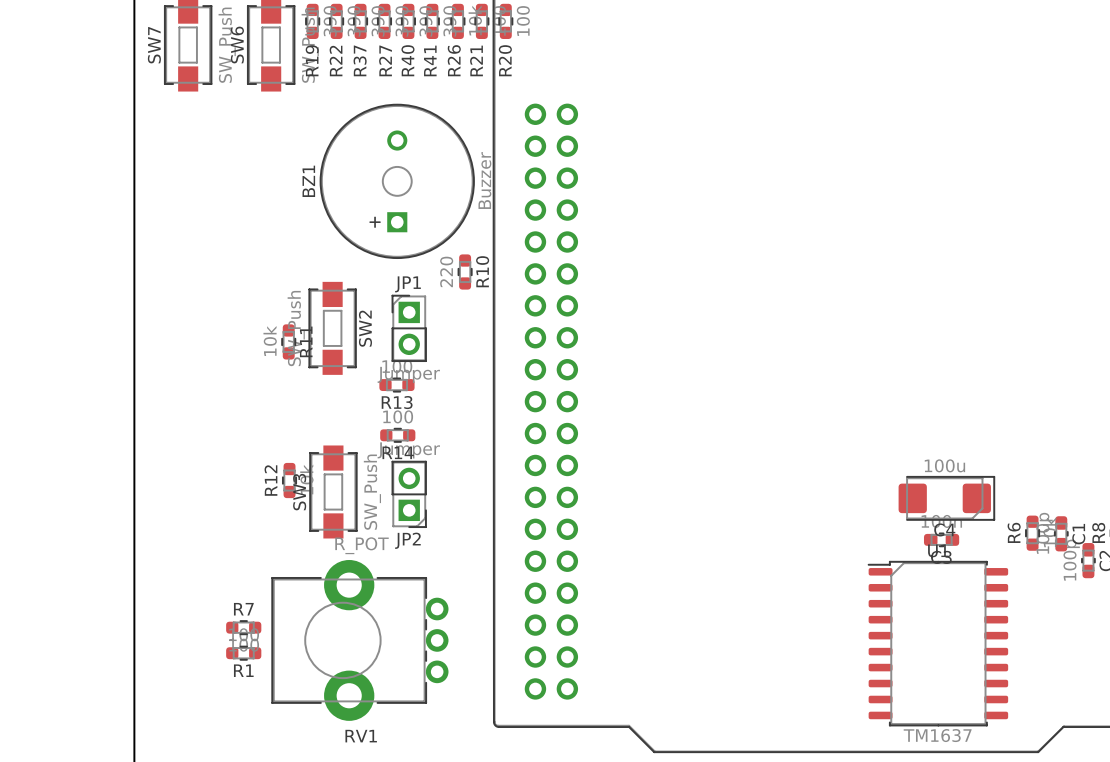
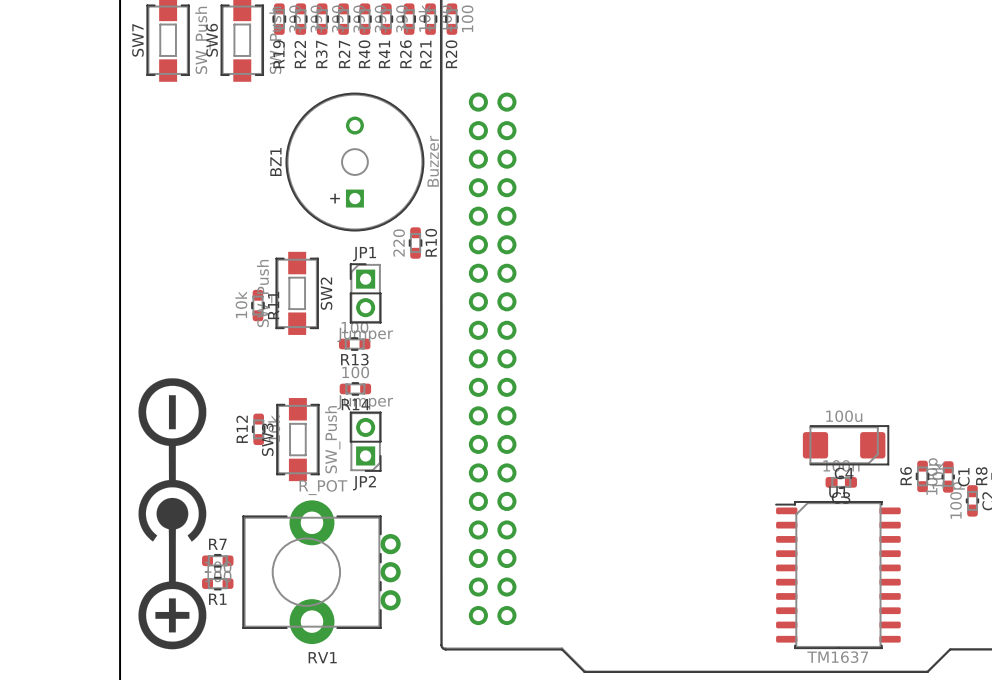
drawing: none -> [138, 378, 207, 650]

